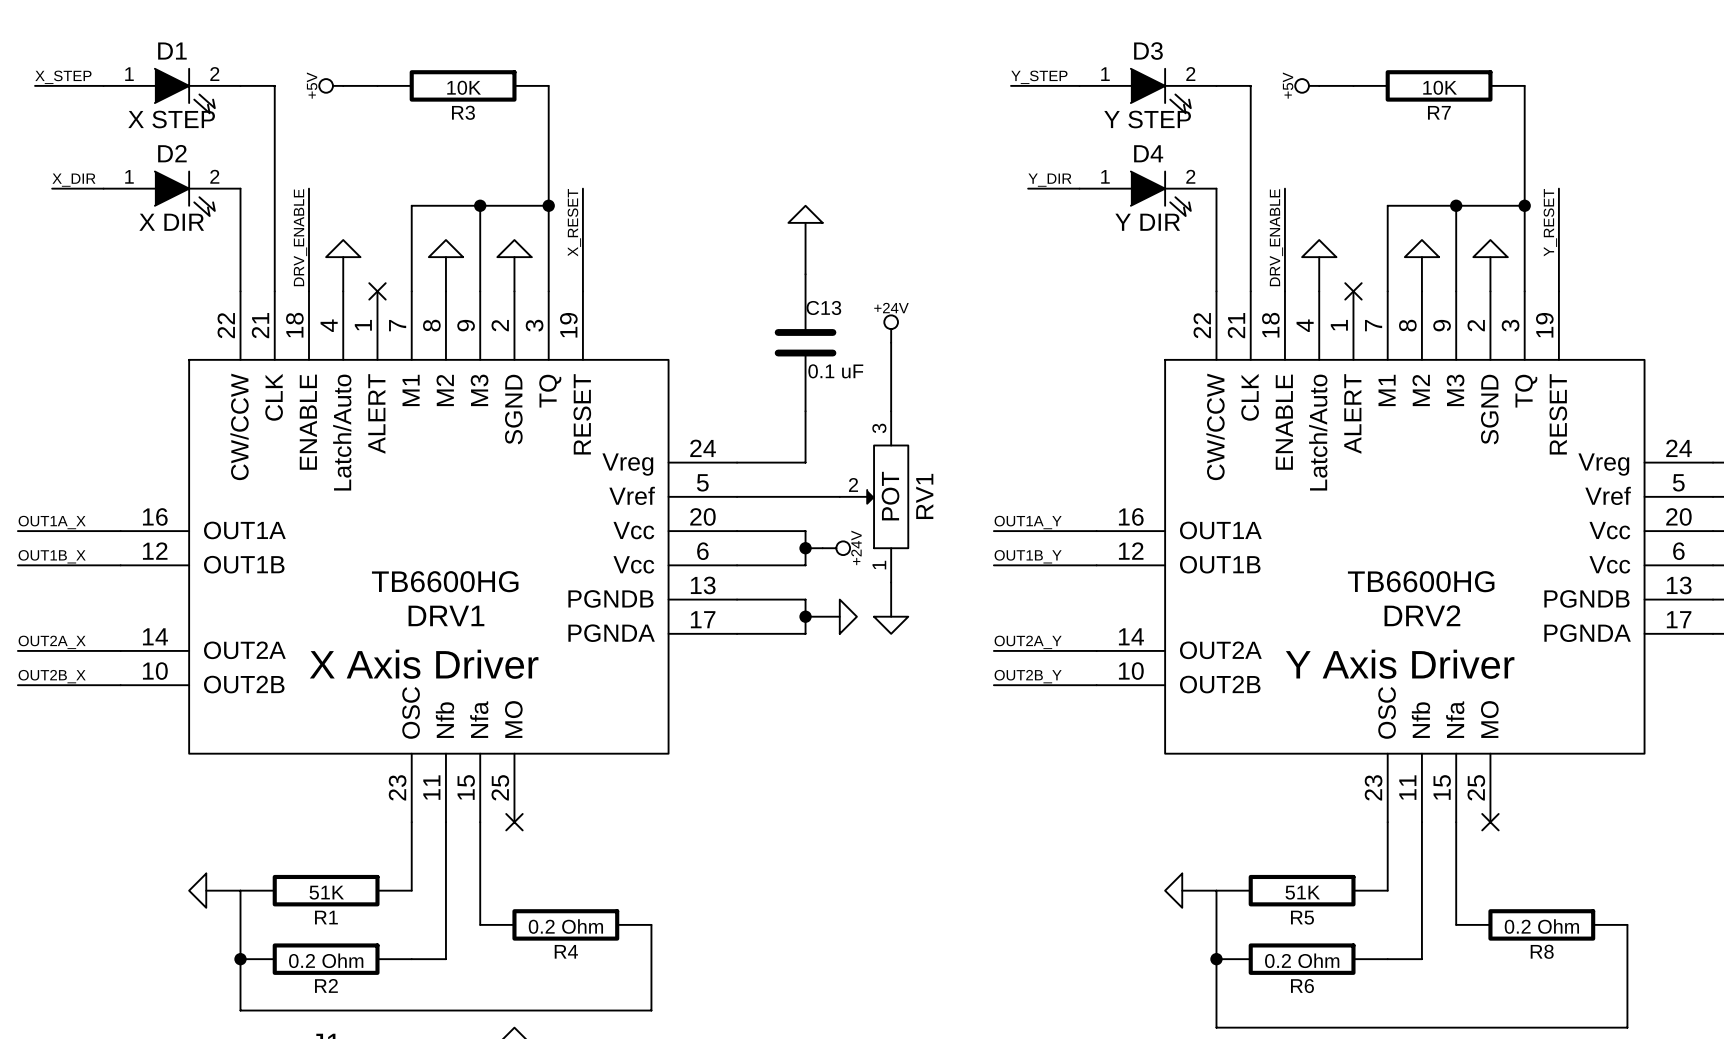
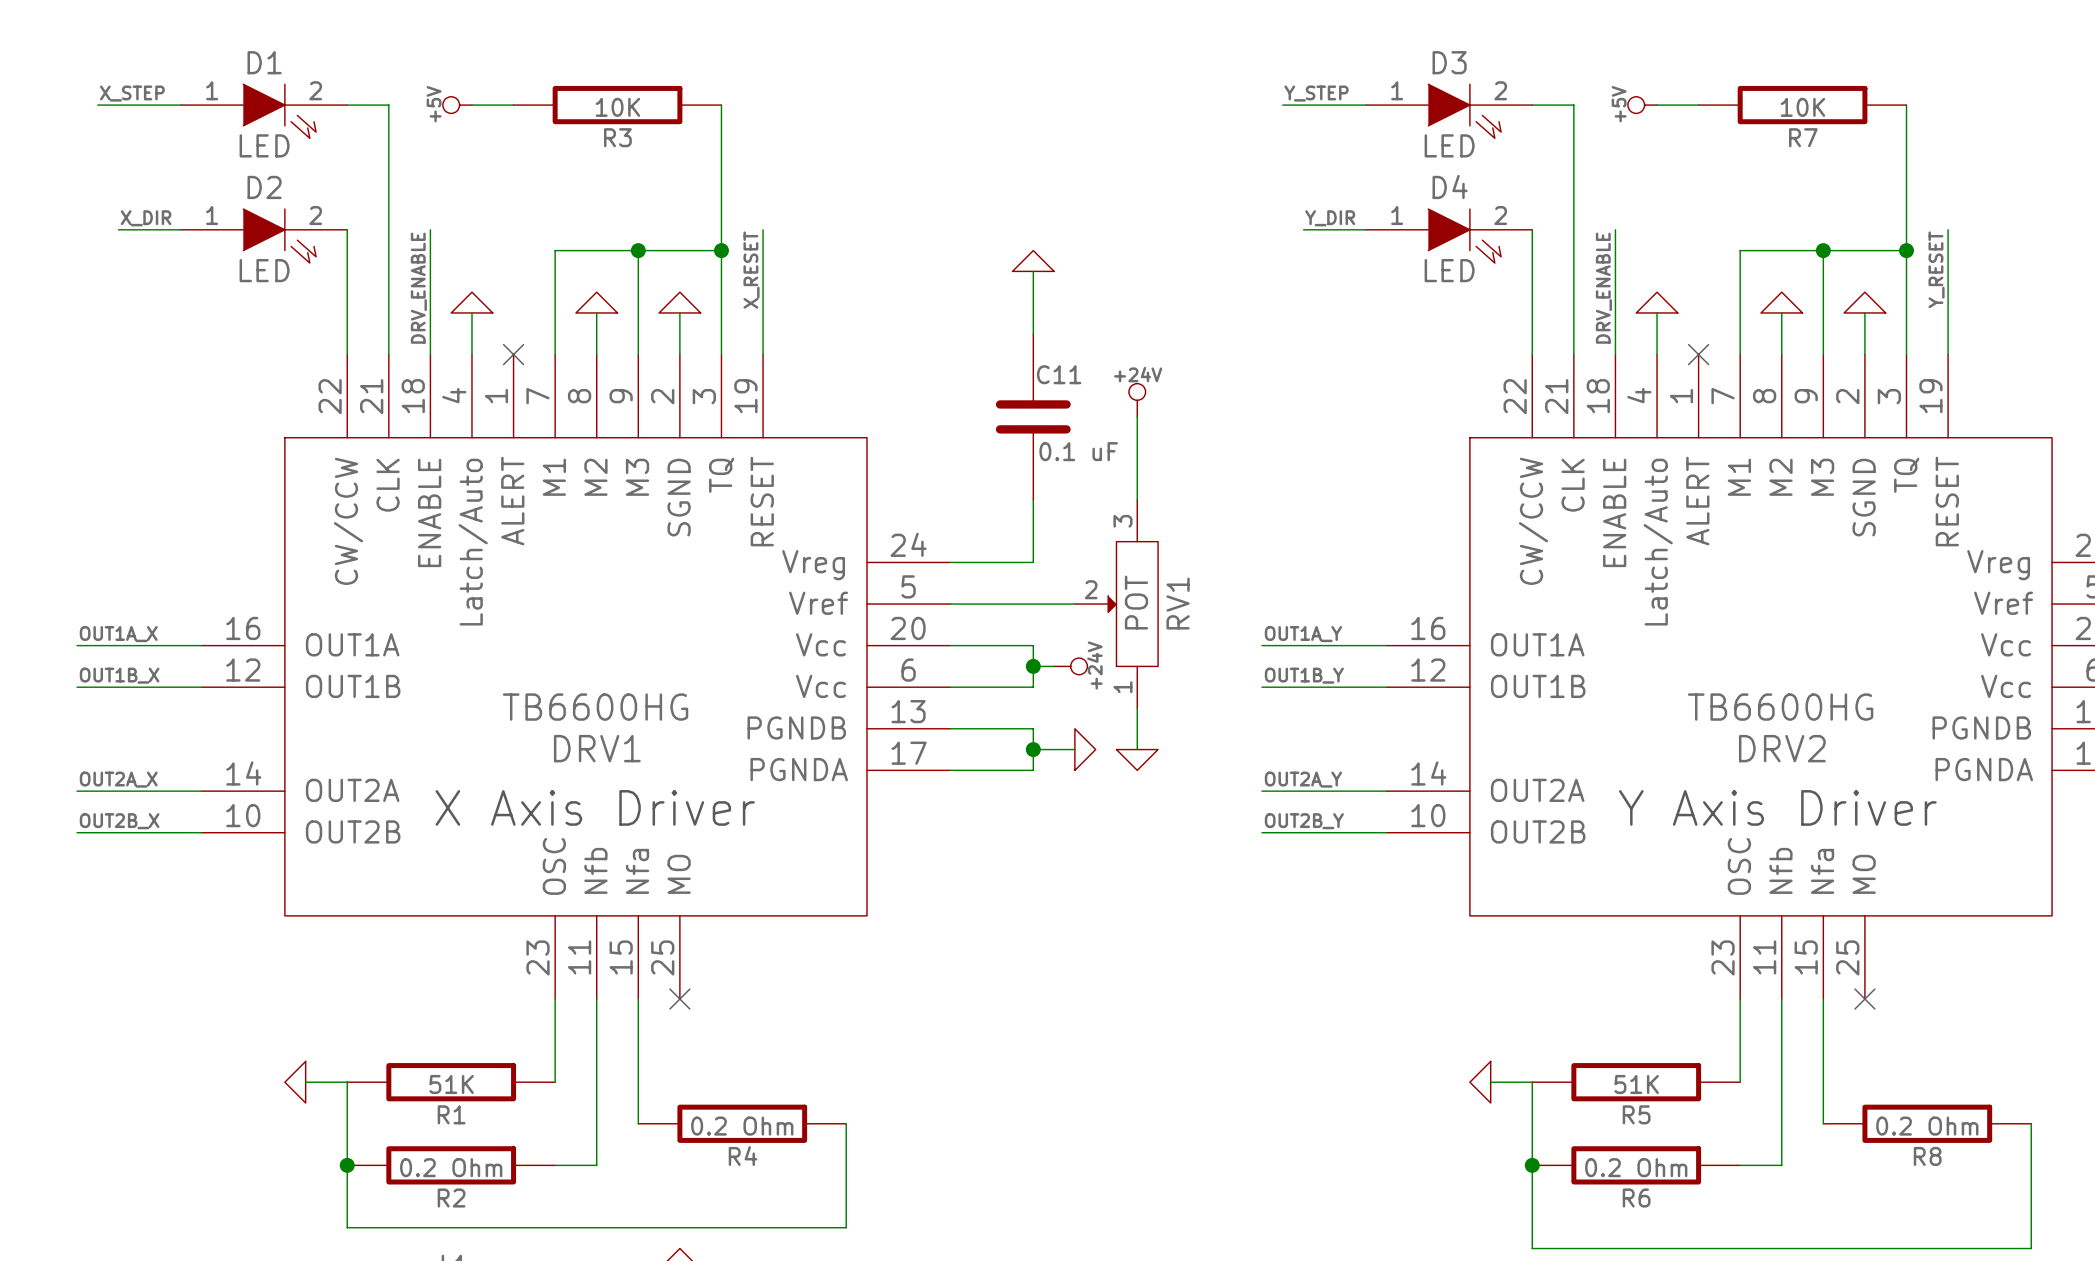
D1 value: X STEP (171, 119) -> LED (264, 145)
D3 value: Y STEP (1147, 119) -> LED (1449, 145)
D2 value: X DIR (171, 222) -> LED (264, 270)
D4 value: Y DIR (1147, 222) -> LED (1449, 270)
C13 name: C13 (823, 307) -> C11 (1059, 374)

